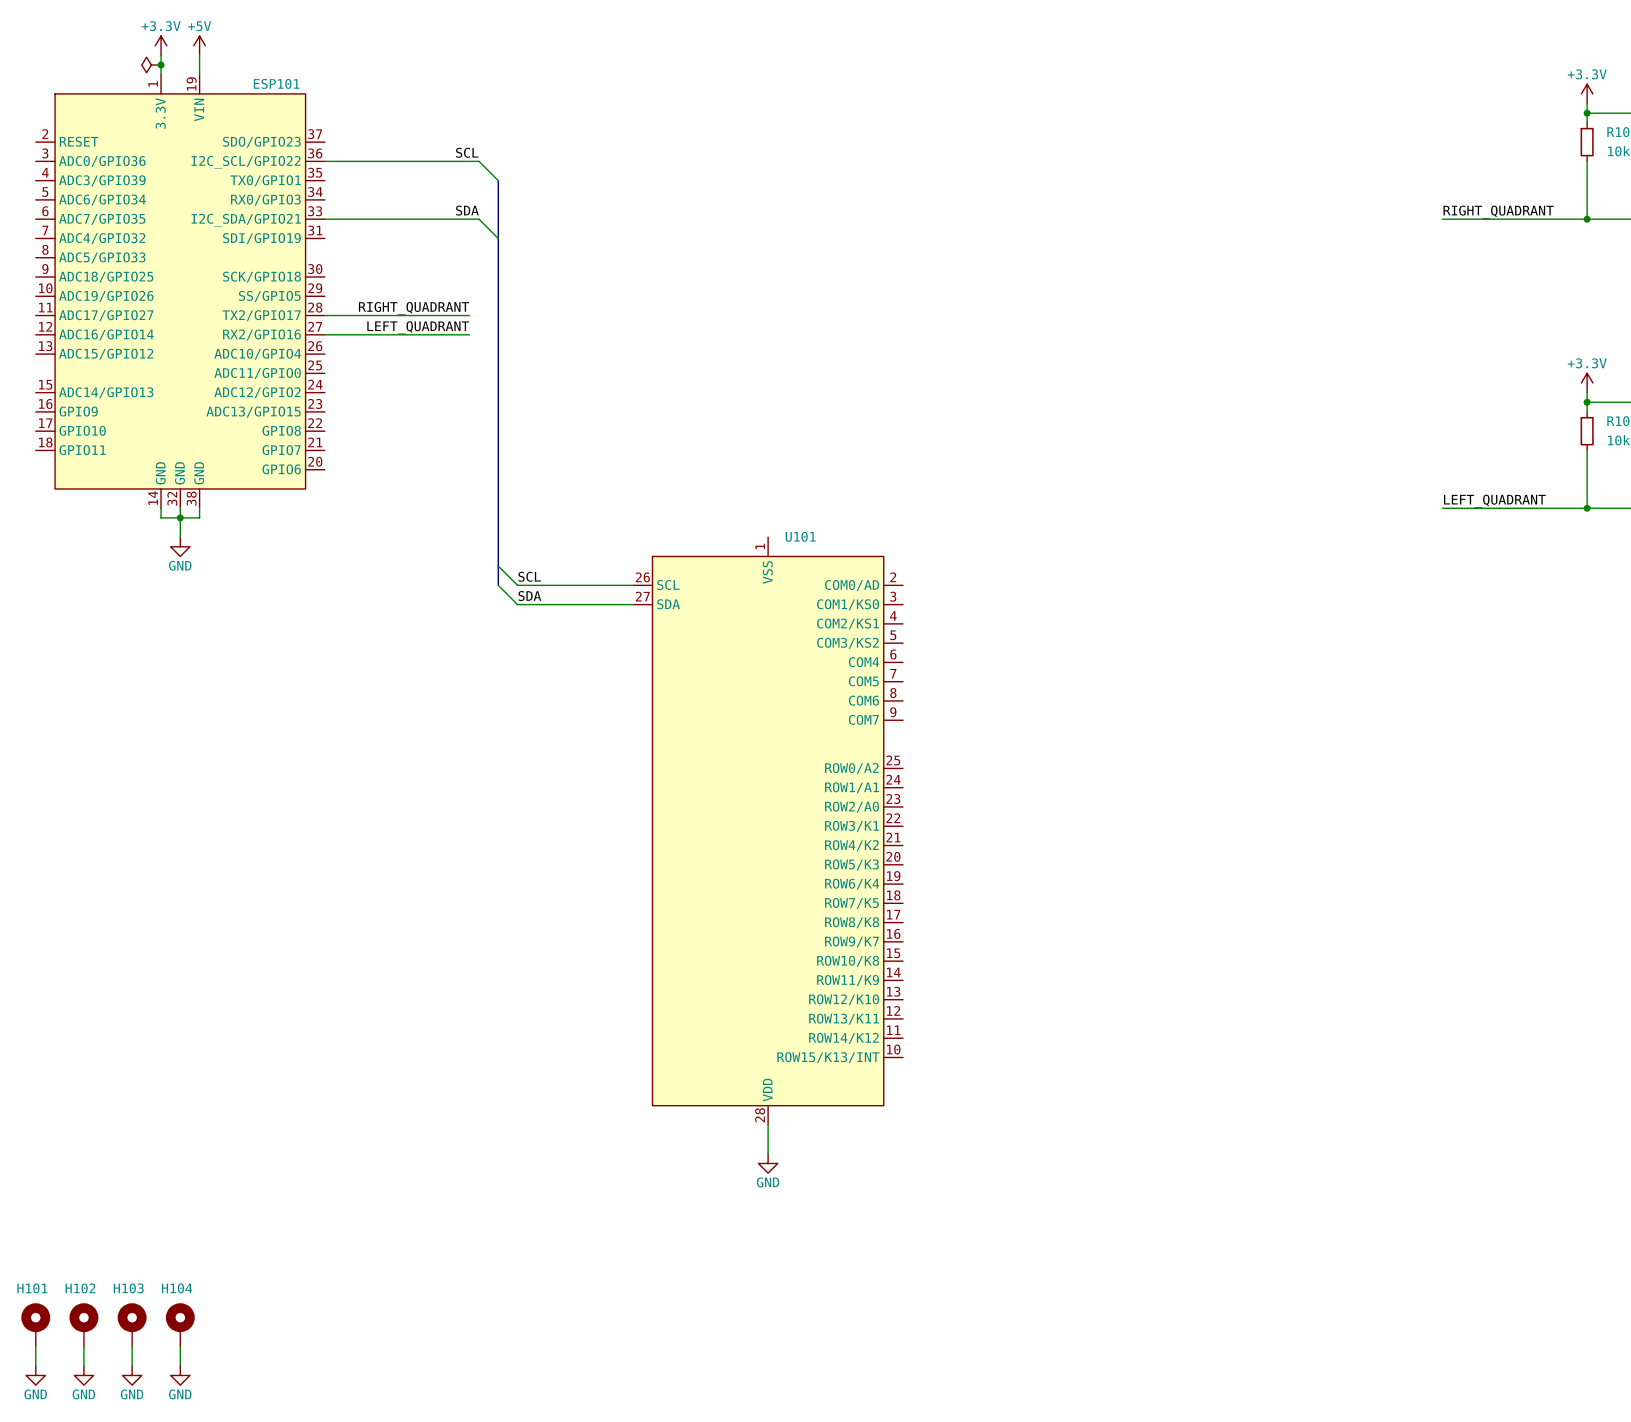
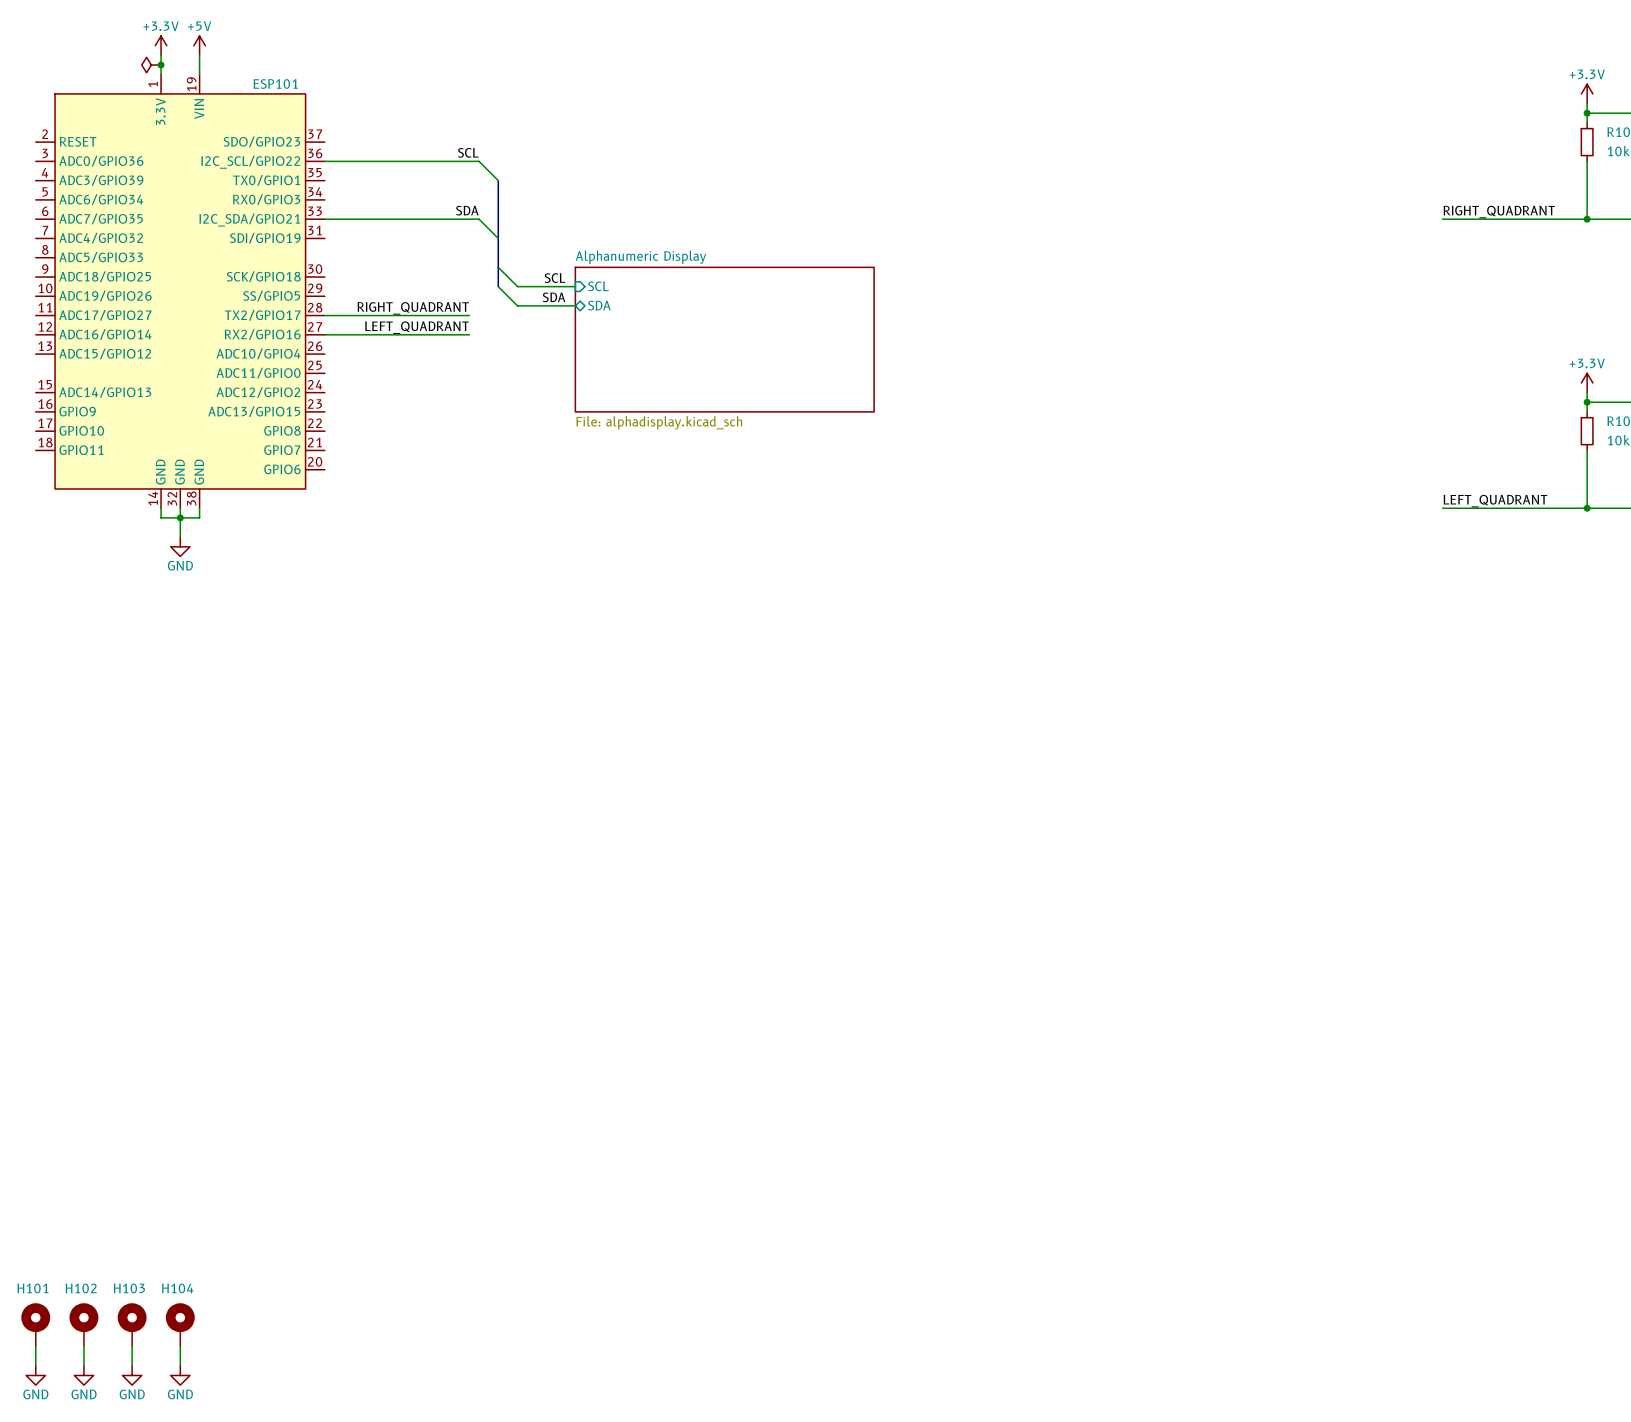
wire: none -> (498, 267) (517, 286) (575, 286)
label: none -> SCL (555, 278)
wire: none -> (498, 286) (517, 305) (575, 305)
bus: (498, 286) (498, 585) -> none
sheet pin: none -> SCL (598, 286)
label: none -> SDA (554, 297)
sheet pin: none -> SDA (599, 305)
sheet Alphanumeric Display: none -> File: alphadisplay.kicad_sch (724, 339)
wire: (498, 566) (517, 585) (633, 585) -> none
label: SCL (529, 576) -> none
wire: (498, 585) (517, 604) (633, 604) -> none
label: SDA (529, 596) -> none
U101: (768, 831) -> none
wire: (768, 1124) (768, 1153) -> none
power symbol: GND (768, 1163) -> none

